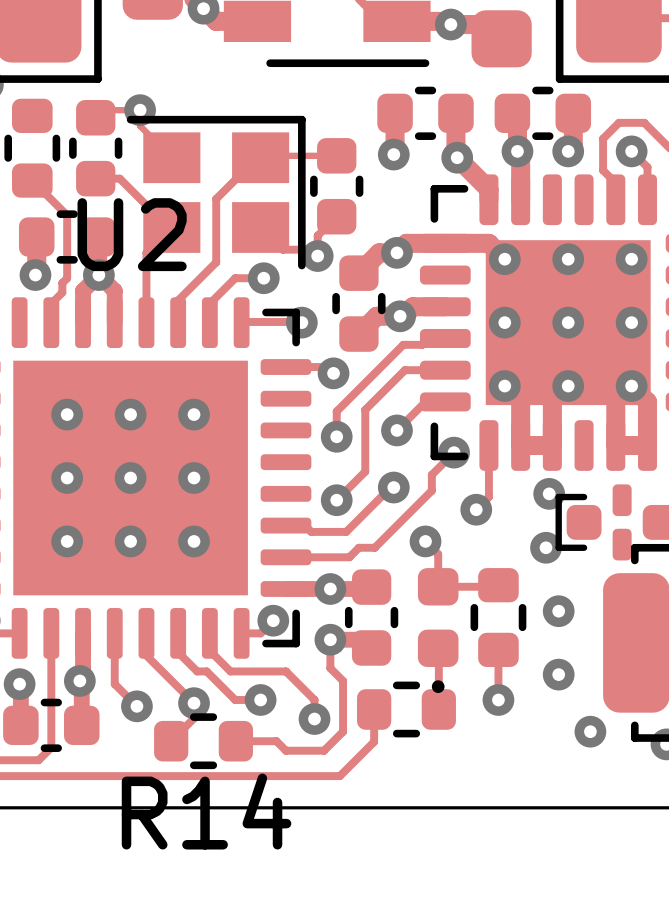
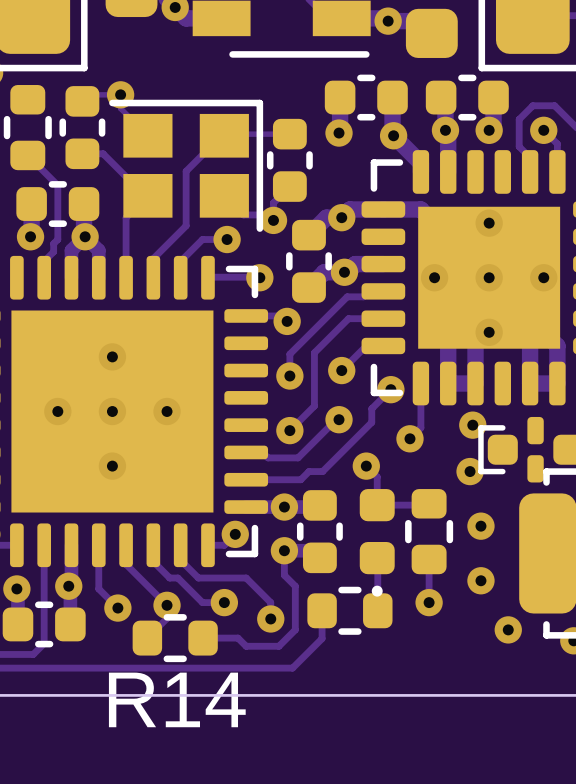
U2 name: U2 (132, 234) -> none
via: (504, 259) -> none
via: (631, 259) -> none
via: (504, 386) -> none
via: (631, 386) -> none
via: (67, 414) -> none
via: (194, 414) -> none
via: (67, 541) -> none
via: (194, 541) -> none

